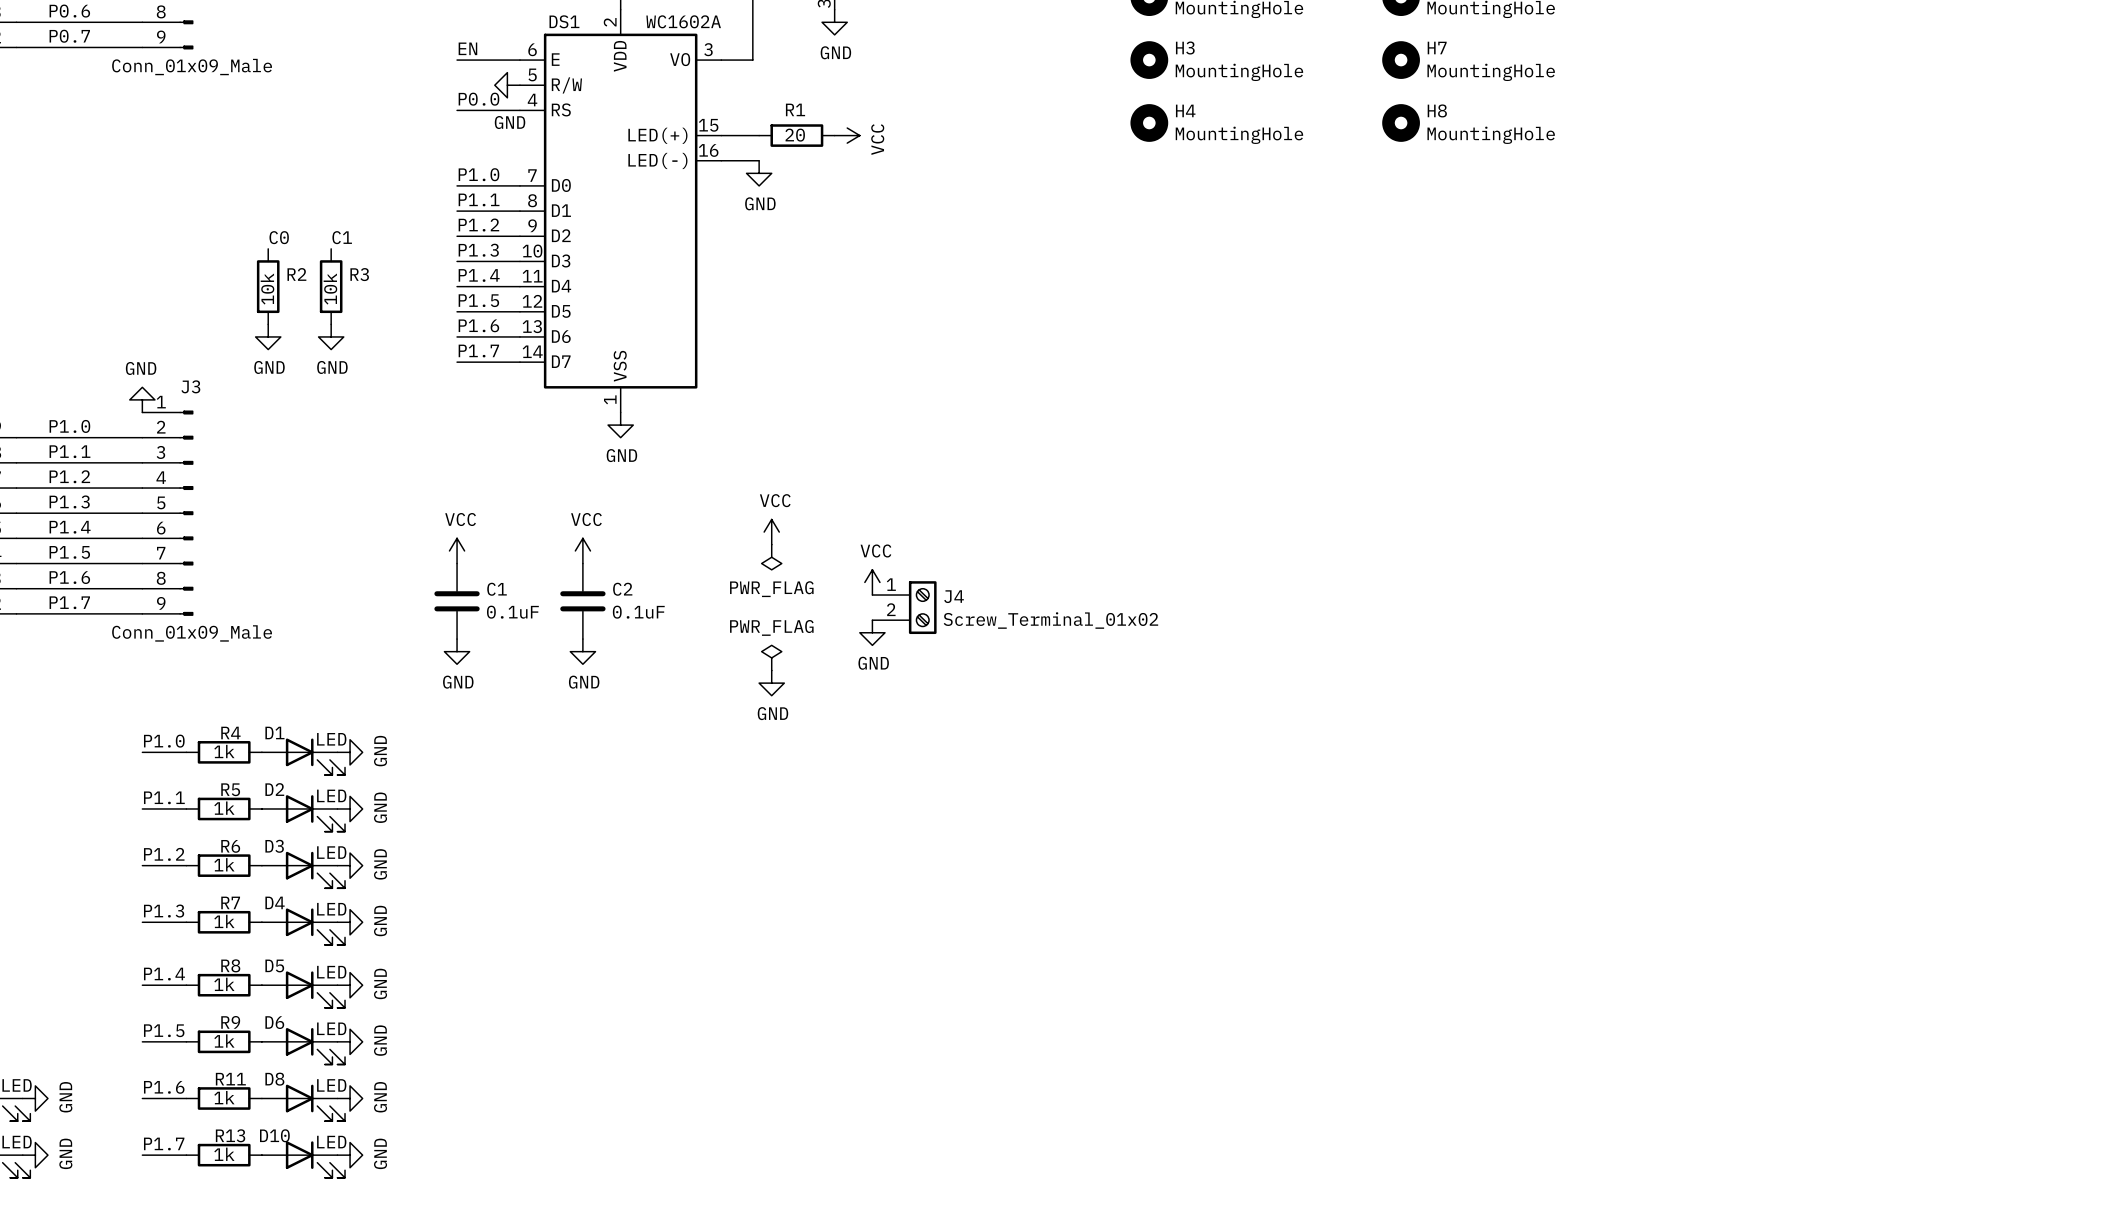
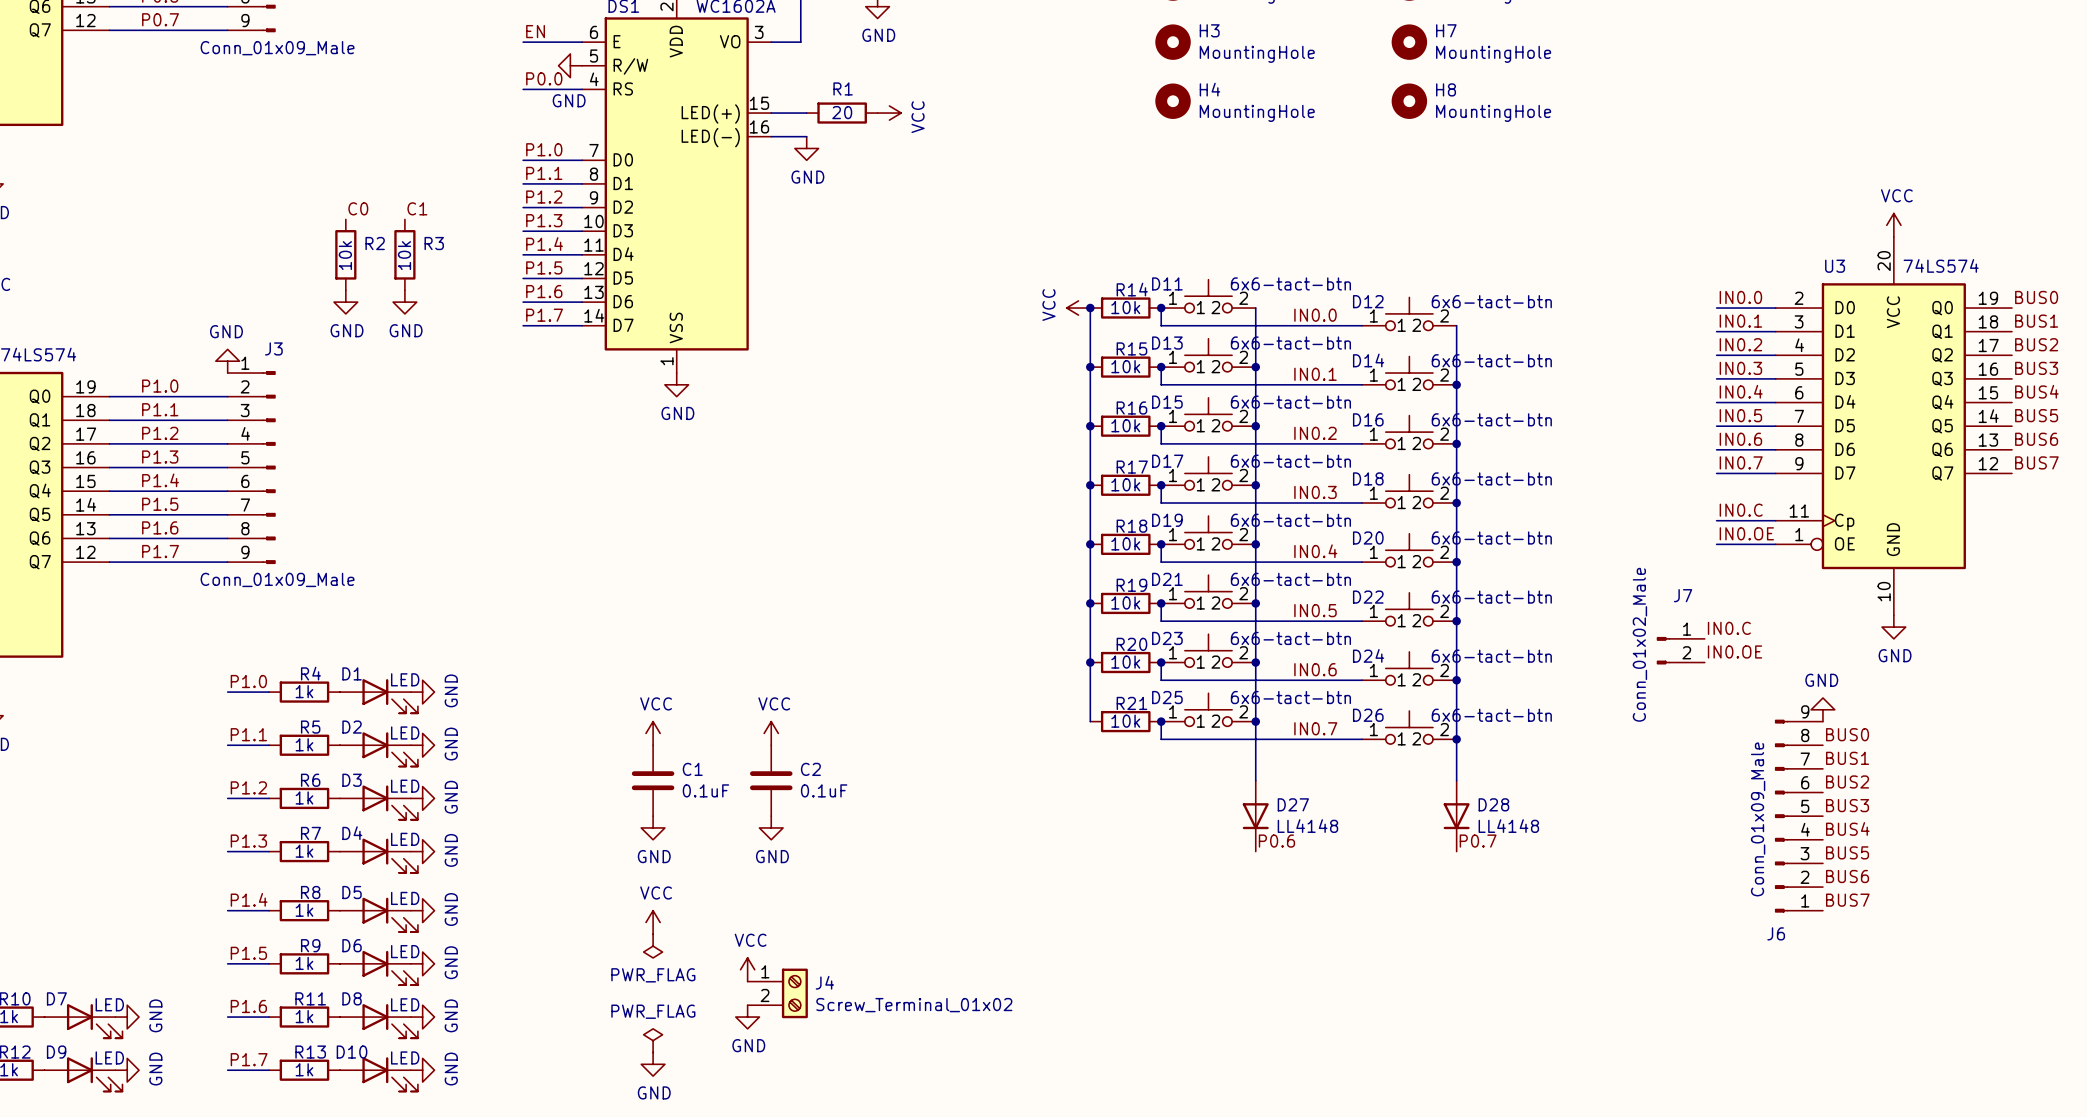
power symbol: none -> VCC (1893, 225)
D11: none -> 6x6-tact-btn (1208, 296)
label: none -> IN0.0 (1740, 297)
label: none -> BUS0 (2036, 297)
power symbol: none -> VCC (1078, 308)
wire: none -> (1090, 308) (1090, 721)
junction: none -> (1090, 308)
R14: none -> 10k (1125, 308)
wire: none -> (1161, 308) (1161, 325) (1362, 325)
junction: none -> (1161, 308)
wire: none -> (1255, 308) (1255, 780)
wire: none -> (1716, 308) (1775, 308)
D12: none -> 6x6-tact-btn (1409, 313)
label: none -> IN0.0 (1315, 315)
label: none -> IN0.1 (1740, 321)
label: none -> BUS1 (2036, 321)
wire: none -> (1456, 325) (1456, 780)
wire: none -> (1716, 331) (1775, 331)
label: none -> IN0.2 (1740, 344)
label: none -> BUS2 (2036, 344)
D13: none -> 6x6-tact-btn (1208, 355)
wire: none -> (1716, 355) (1775, 355)
junction: none -> (1090, 367)
R15: none -> 10k (1125, 367)
wire: none -> (1161, 367) (1161, 384) (1362, 384)
junction: none -> (1161, 367)
junction: none -> (1255, 367)
label: none -> IN0.3 (1740, 368)
label: none -> BUS3 (2036, 368)
D14: none -> 6x6-tact-btn (1409, 373)
label: none -> IN0.1 (1315, 374)
wire: none -> (1716, 378) (1775, 378)
junction: none -> (1456, 384)
label: none -> IN0.4 (1741, 391)
label: none -> BUS4 (2036, 391)
wire: none -> (1716, 402) (1775, 402)
D15: none -> 6x6-tact-btn (1208, 414)
label: none -> IN0.5 (1740, 415)
label: none -> BUS5 (2036, 415)
junction: none -> (1090, 426)
R16: none -> 10k (1125, 426)
wire: none -> (1161, 426) (1161, 443) (1362, 443)
junction: none -> (1161, 426)
junction: none -> (1255, 426)
wire: none -> (1716, 426) (1775, 426)
U3: none -> 74LS574 (1893, 426)
D16: none -> 6x6-tact-btn (1409, 432)
label: none -> IN0.2 (1315, 433)
label: none -> IN0.6 (1740, 439)
label: none -> BUS6 (2036, 439)
junction: none -> (1456, 443)
wire: none -> (1716, 449) (1775, 449)
label: none -> IN0.7 (1741, 462)
label: none -> BUS7 (2036, 462)
D17: none -> 6x6-tact-btn (1208, 473)
wire: none -> (1716, 473) (1775, 473)
power symbol: VCC (771, 532) -> none
junction: none -> (1090, 485)
R17: none -> 10k (1125, 485)
wire: none -> (1161, 485) (1161, 503) (1362, 503)
junction: none -> (1161, 485)
junction: none -> (1255, 485)
D18: none -> 6x6-tact-btn (1409, 491)
label: none -> IN0.3 (1315, 492)
power symbol: VCC (457, 550) -> none
power symbol: VCC (582, 550) -> none
junction: none -> (1456, 503)
power symbol: PWR_FLAG (771, 557) -> none
label: none -> IN0.C (1741, 510)
wire: none -> (1716, 520) (1775, 520)
power symbol: VCC (872, 582) -> none
D19: none -> 6x6-tact-btn (1208, 532)
label: none -> IN0.OE (1746, 533)
junction: none -> (1090, 544)
R18: none -> 10k (1125, 544)
wire: none -> (1161, 544) (1161, 562) (1362, 562)
junction: none -> (1161, 544)
junction: none -> (1255, 544)
wire: none -> (1716, 544) (1775, 544)
C1 position: (457, 601) -> (653, 780)
C2 position: (582, 601) -> (771, 780)
D20: none -> 6x6-tact-btn (1409, 550)
label: none -> IN0.4 (1315, 551)
J4 position: (904, 607) -> (777, 993)
junction: none -> (1456, 562)
power symbol: GND (872, 632) -> none
D21: none -> 6x6-tact-btn (1208, 591)
power symbol: GND (457, 651) -> none
power symbol: GND (582, 651) -> none
power symbol: PWR_FLAG (771, 657) -> none
junction: none -> (1090, 603)
R19: none -> 10k (1125, 603)
wire: none -> (1161, 603) (1161, 621) (1362, 621)
junction: none -> (1161, 603)
junction: none -> (1255, 603)
D22: none -> 6x6-tact-btn (1409, 609)
label: none -> IN0.5 (1315, 610)
junction: none -> (1456, 621)
power symbol: GND (771, 683) -> none
power symbol: none -> GND (1893, 627)
label: none -> IN0.C (1729, 628)
D23: none -> 6x6-tact-btn (1208, 650)
J7: none -> Conn_01x02_Male (1680, 650)
label: none -> IN0.OE (1734, 651)
junction: none -> (1090, 662)
R20: none -> 10k (1125, 662)
wire: none -> (1161, 662) (1161, 680) (1362, 680)
junction: none -> (1161, 662)
junction: none -> (1255, 662)
D24: none -> 6x6-tact-btn (1409, 668)
label: none -> IN0.6 (1315, 669)
junction: none -> (1456, 680)
D25: none -> 6x6-tact-btn (1208, 709)
power symbol: none -> GND (1822, 709)
R21: none -> 10k (1125, 721)
wire: none -> (1161, 721) (1161, 739) (1362, 739)
junction: none -> (1161, 721)
junction: none -> (1255, 721)
D26: none -> 6x6-tact-btn (1409, 727)
label: none -> IN0.7 (1315, 728)
power symbol: none -> VCC (653, 733)
power symbol: none -> VCC (771, 733)
label: none -> BUS0 (1847, 734)
junction: none -> (1456, 739)
label: none -> BUS1 (1847, 758)
label: none -> BUS2 (1847, 781)
label: none -> BUS3 (1847, 805)
D27: none -> LL4148 (1255, 816)
D28: none -> LL4148 (1456, 816)
J6: none -> Conn_01x09_Male (1798, 816)
power symbol: none -> GND (653, 827)
power symbol: none -> GND (771, 827)
label: none -> BUS4 (1847, 828)
label: none -> P0.6 (1276, 841)
label: none -> P0.7 (1478, 841)
label: none -> BUS5 (1847, 852)
label: none -> BUS6 (1847, 876)
label: none -> BUS7 (1847, 900)
power symbol: none -> VCC (653, 922)
power symbol: none -> PWR_FLAG (653, 946)
power symbol: none -> VCC (747, 969)
power symbol: none -> GND (747, 1017)
power symbol: none -> PWR_FLAG (653, 1040)
power symbol: none -> GND (653, 1064)

